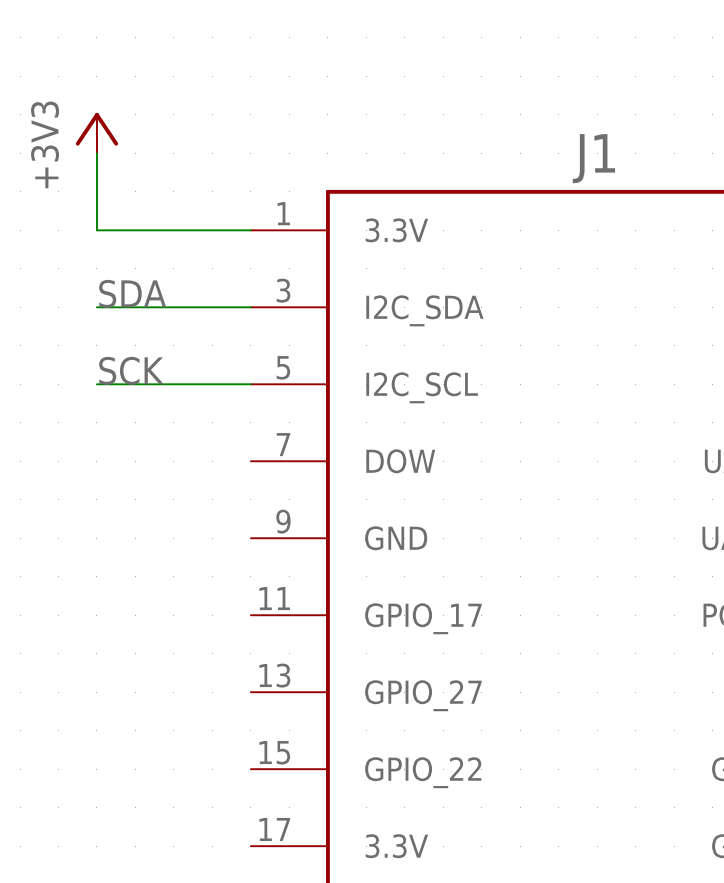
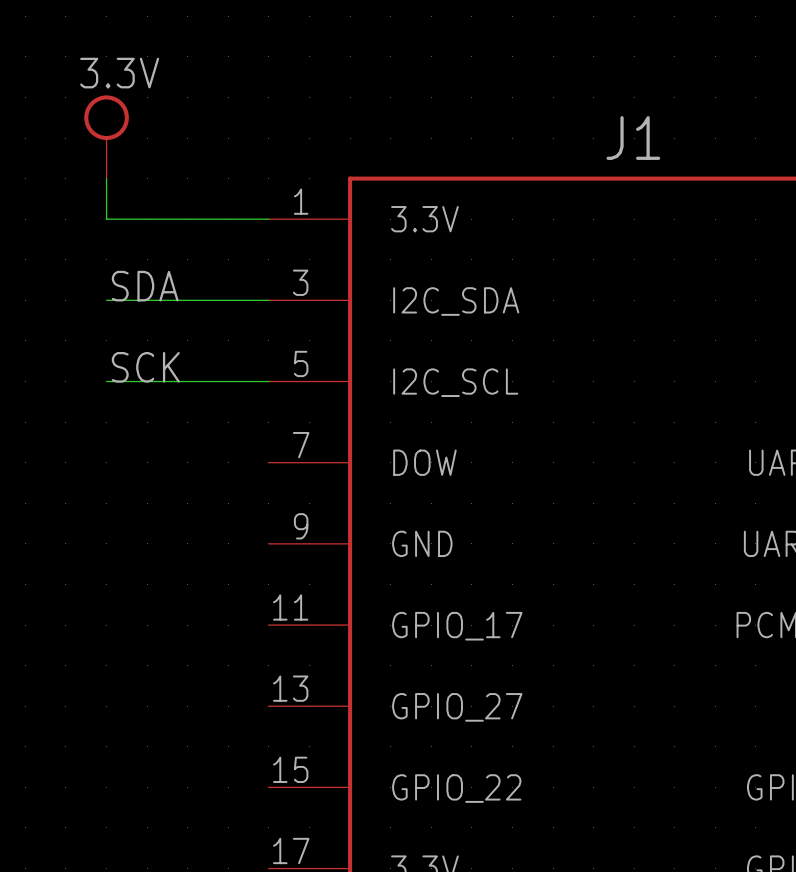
power symbol: +3V3 (96, 133) -> none
power symbol: none -> 3.3V (106, 136)

